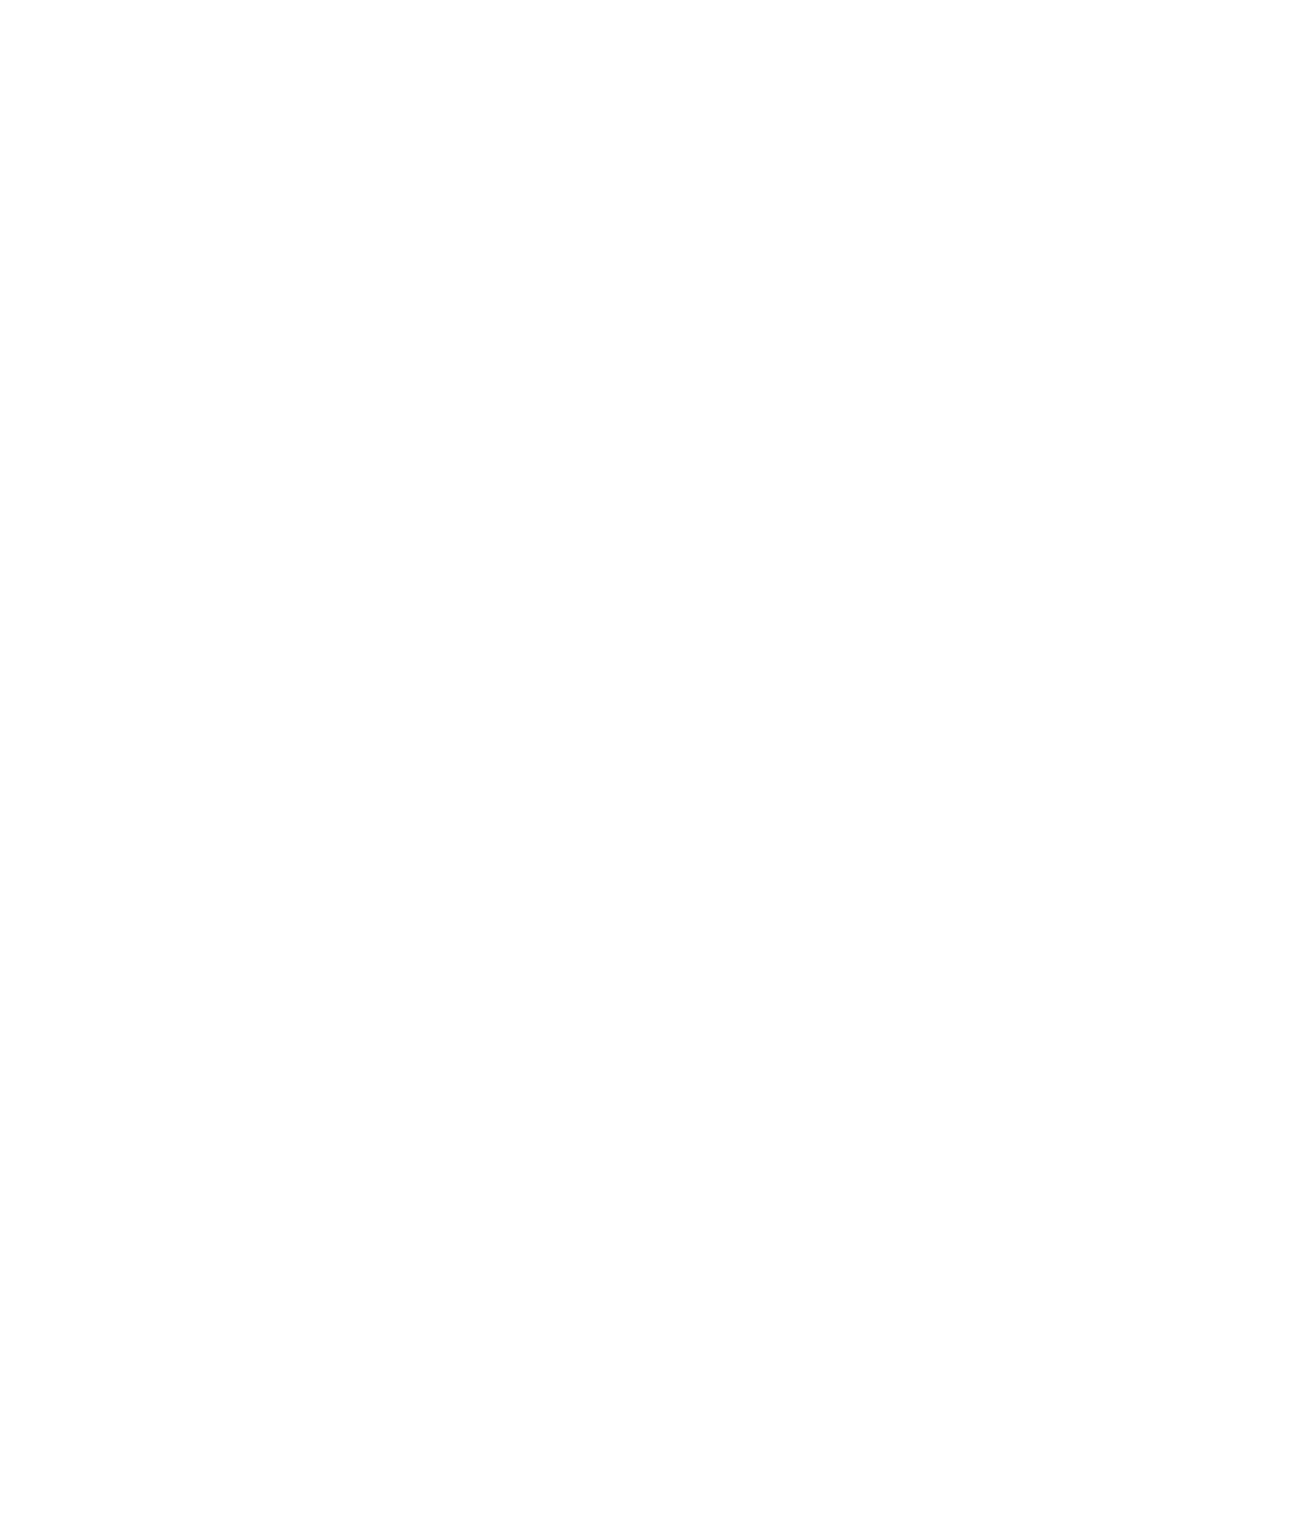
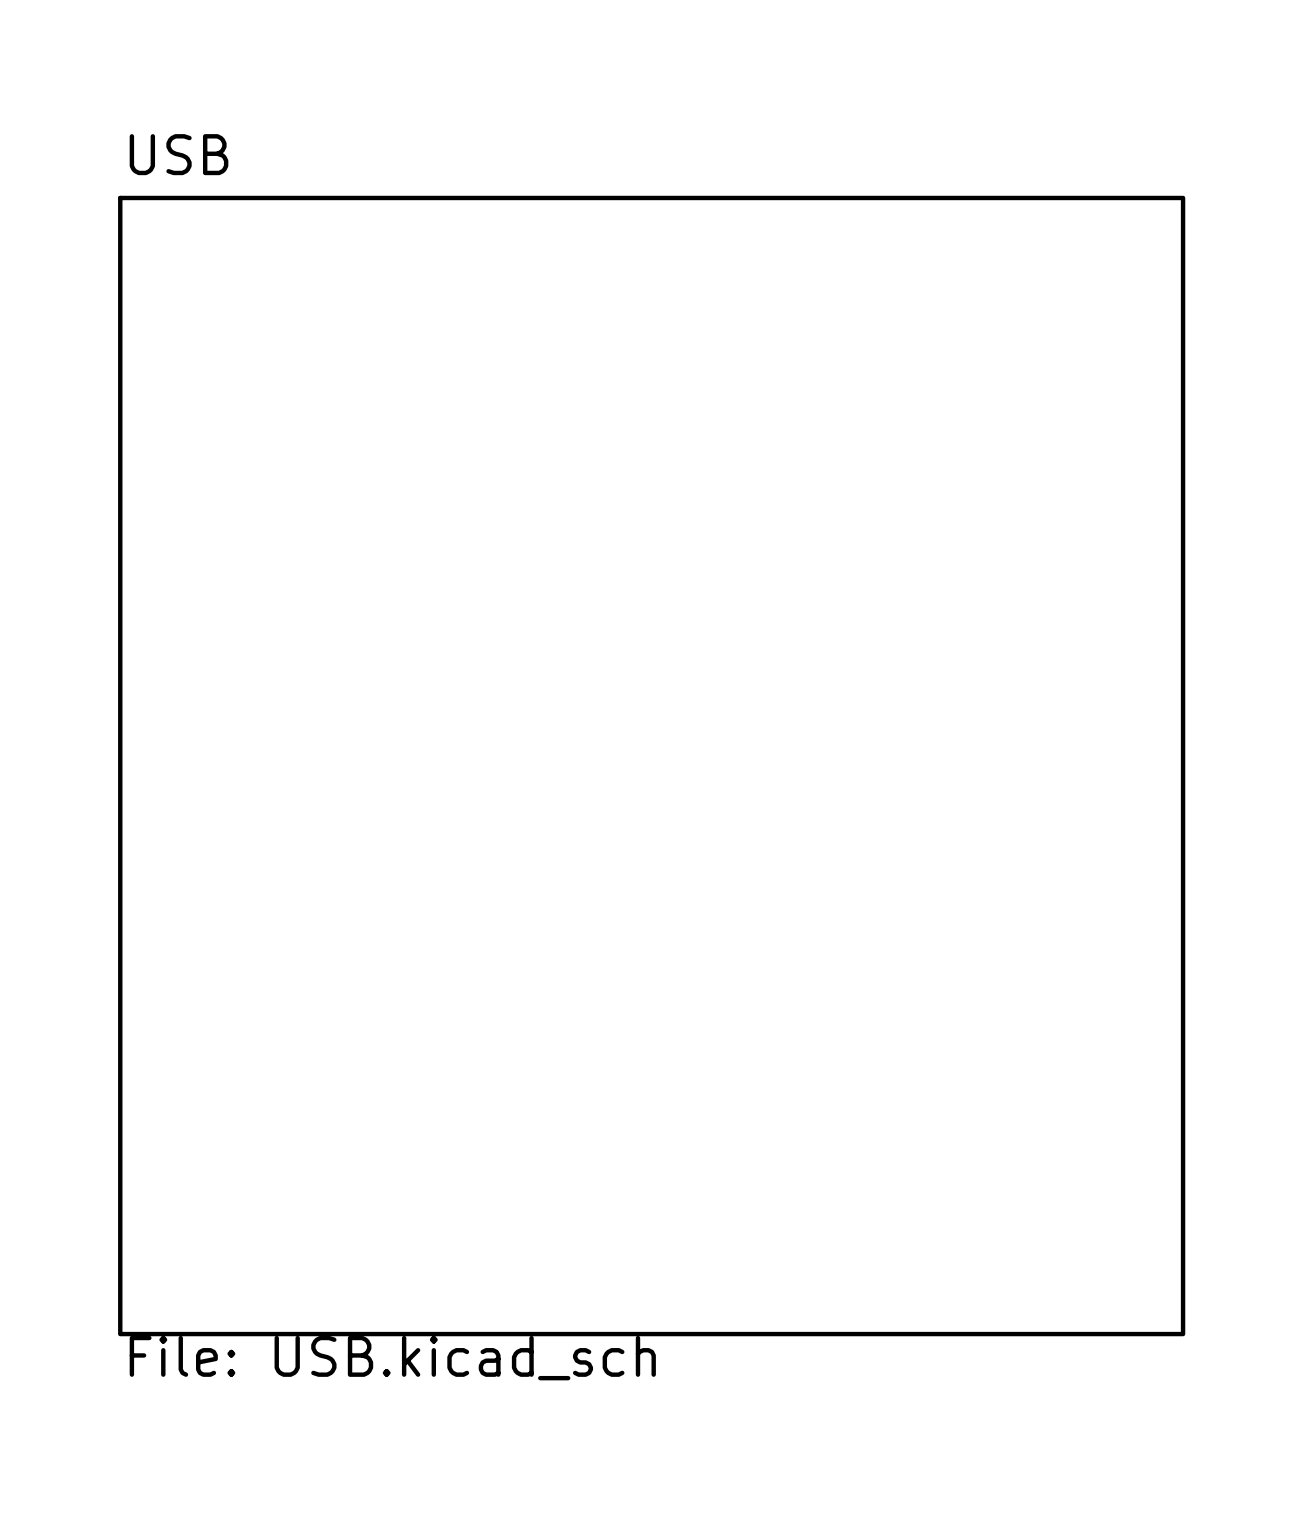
sheet USB: none -> File: USB.kicad_sch (651, 766)

